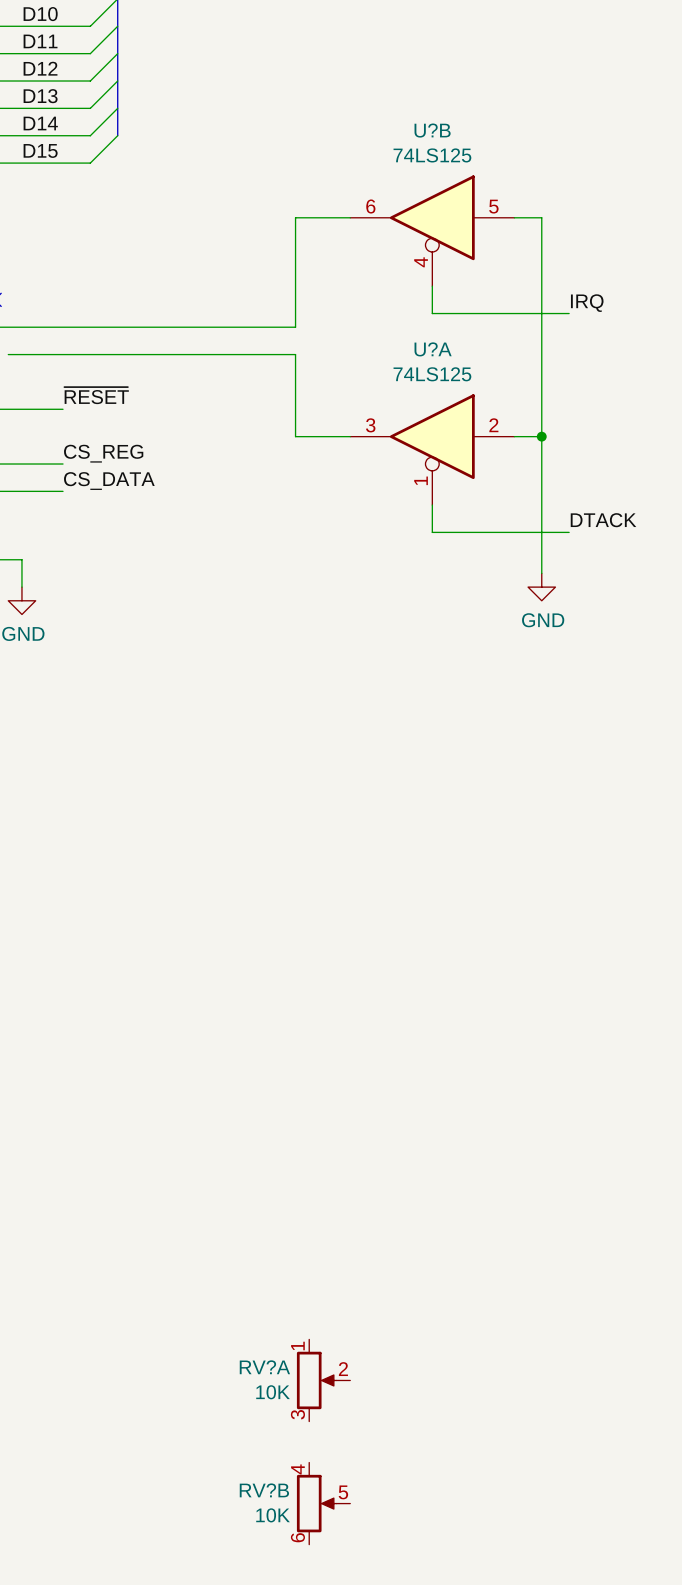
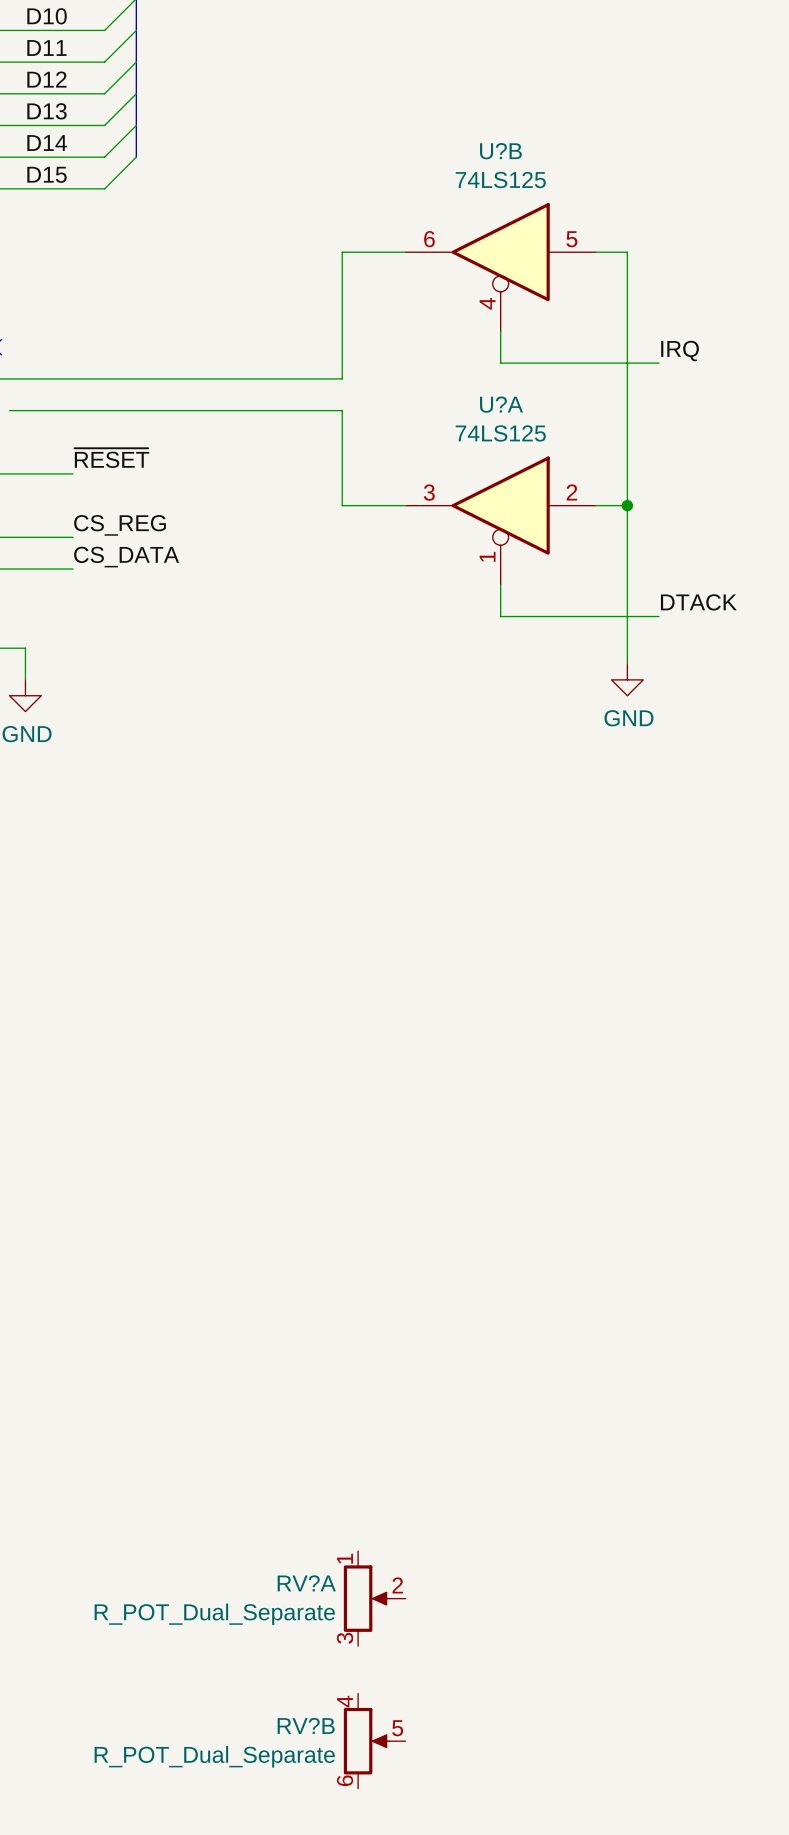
RV?A value: 10K (273, 1392) -> R_POT_Dual_Separate (214, 1614)
RV?B value: 10K (273, 1515) -> R_POT_Dual_Separate (214, 1756)

